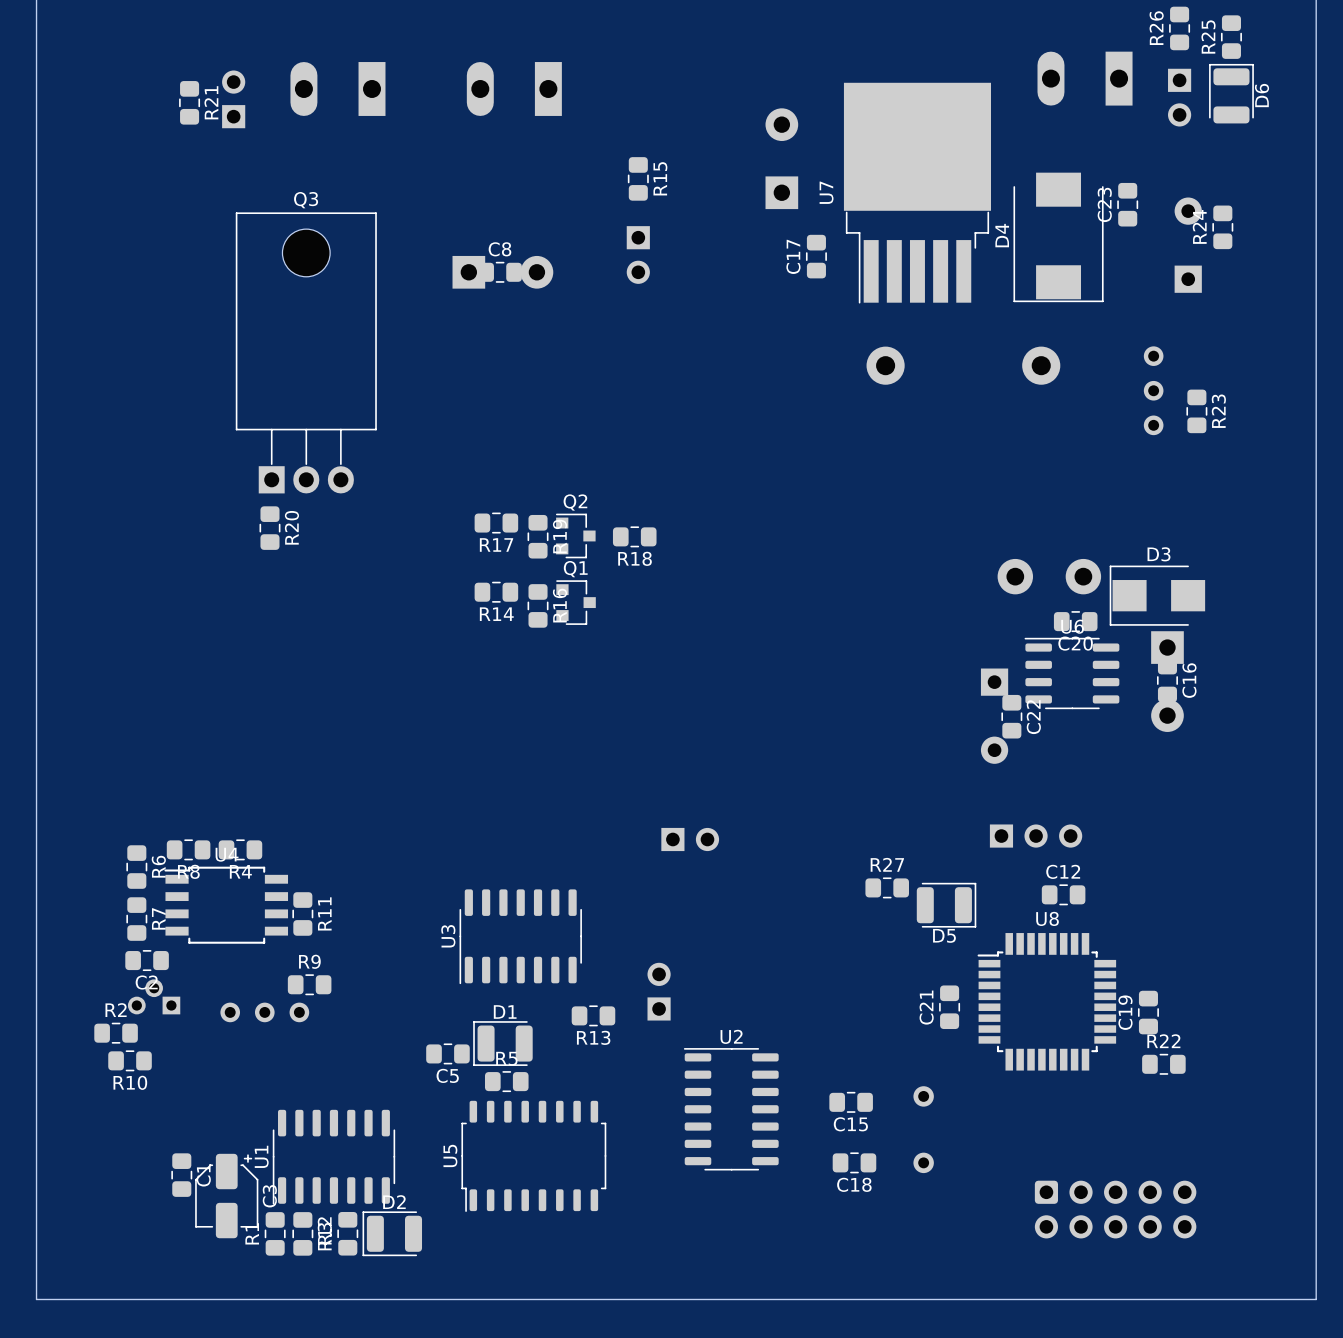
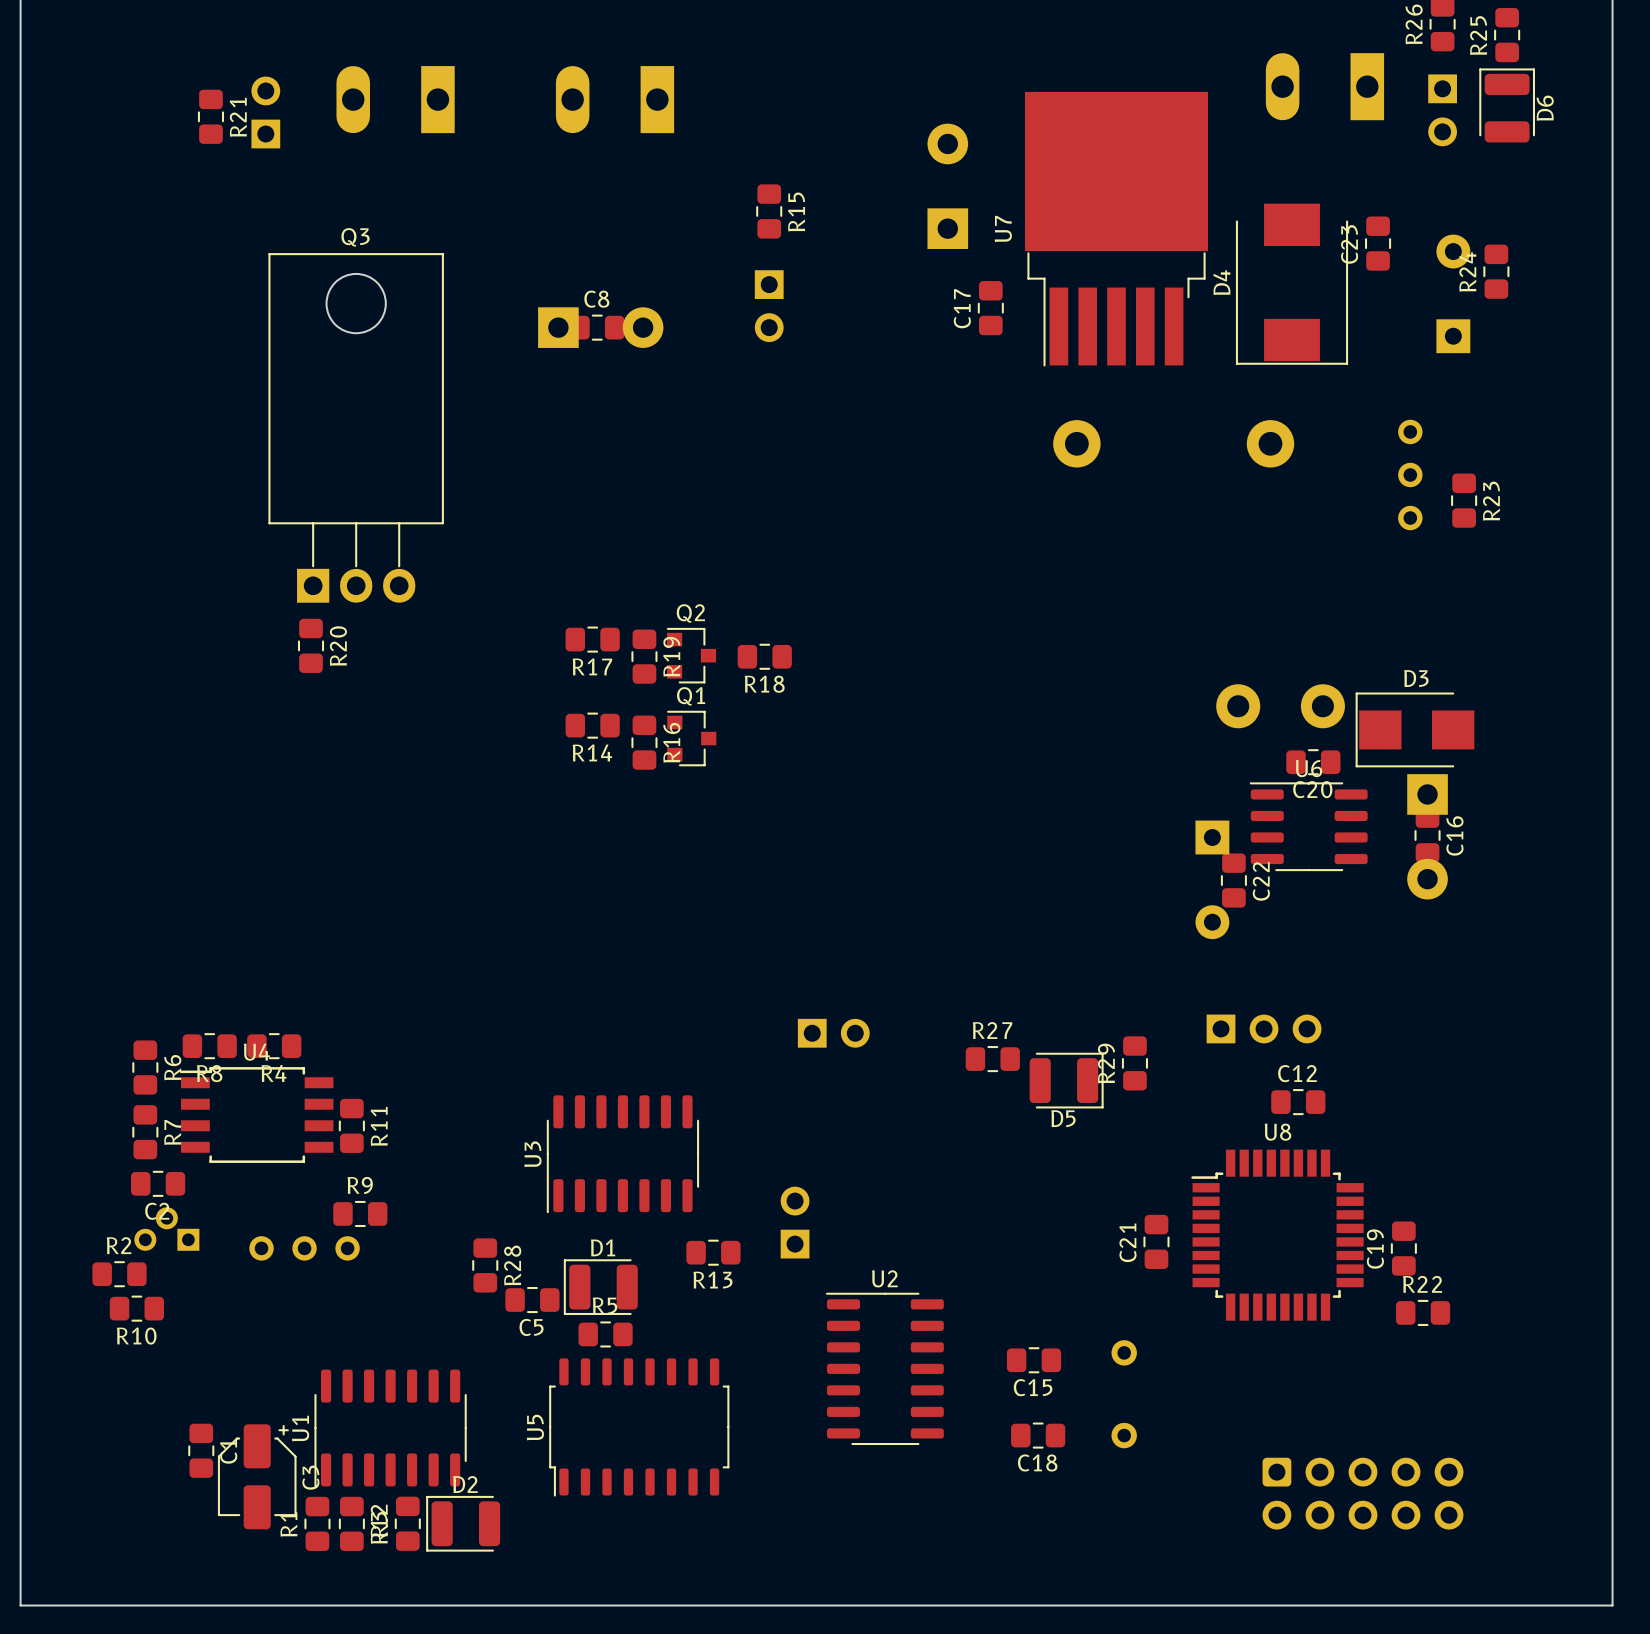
R29: none -> (1134, 1063)
R27 position: (887, 887) -> (992, 1059)
D5 position: (946, 905) -> (1066, 1080)
R28: none -> (485, 1265)

